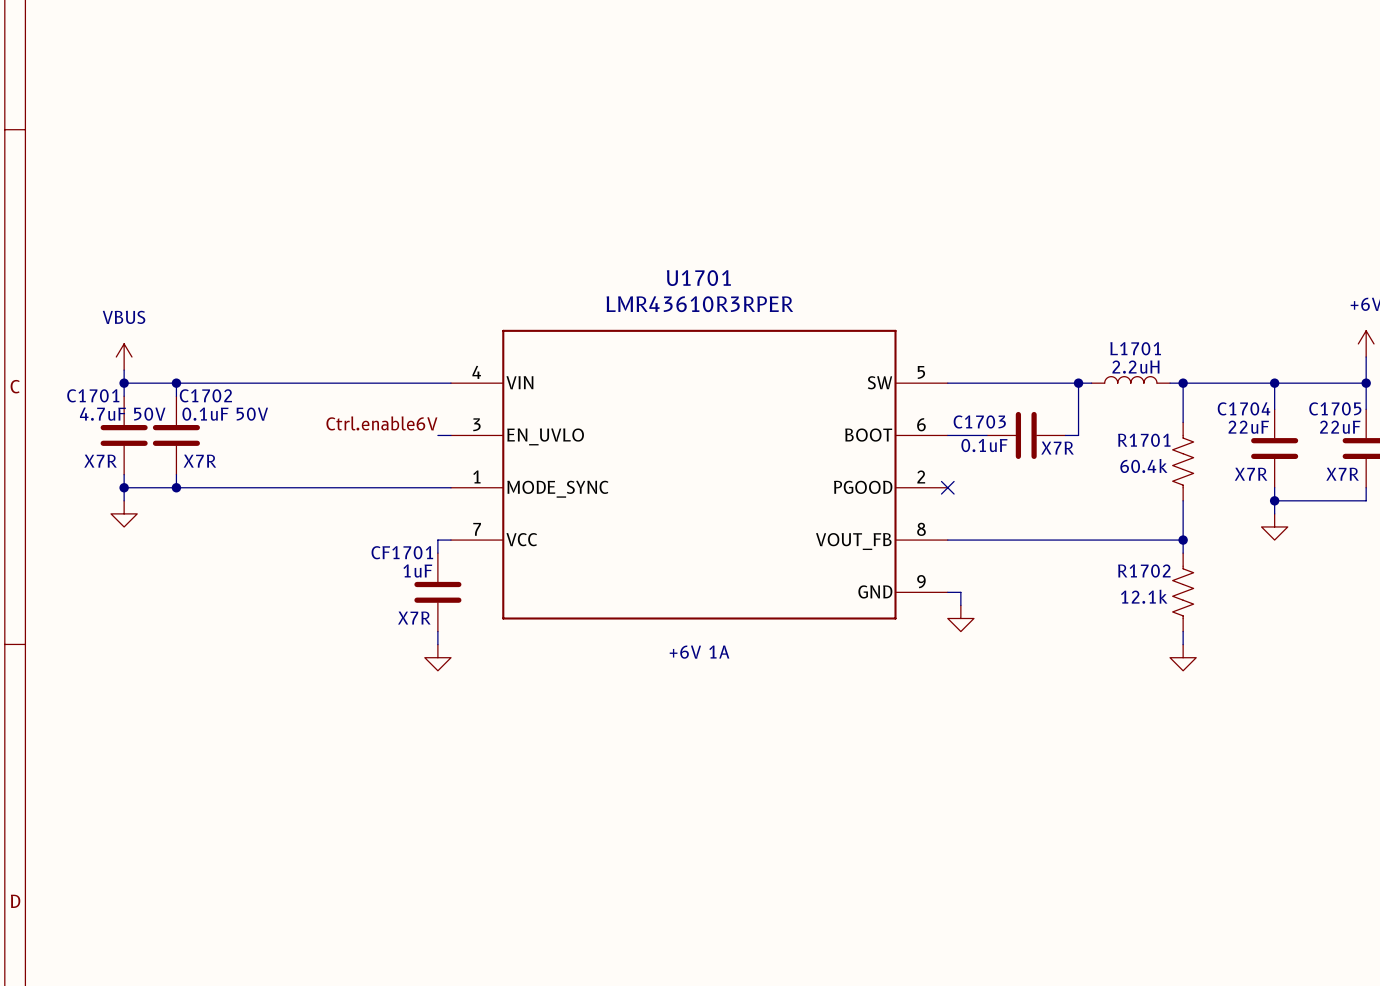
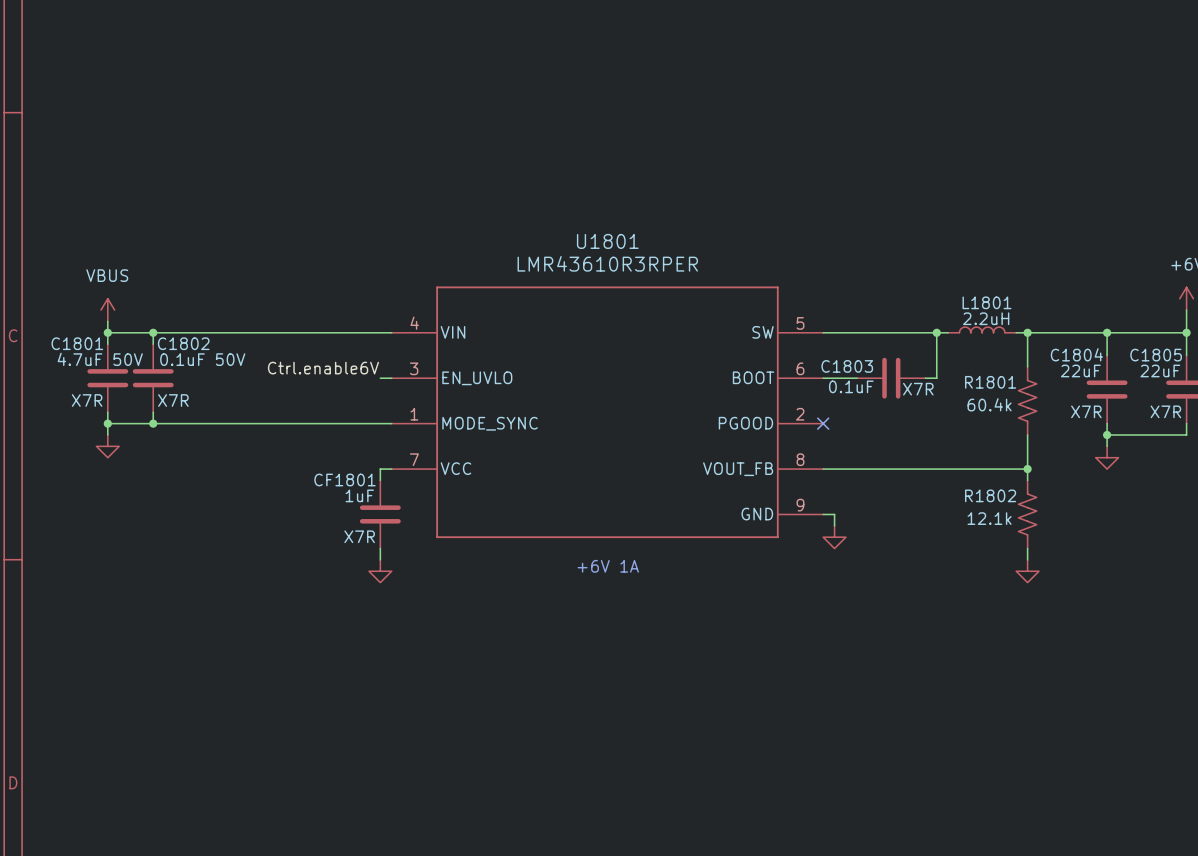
U1701 name: U1701 (698, 278) -> U1801 (607, 241)
L1701 name: L1701 (1135, 348) -> L1801 (986, 302)
C1701 name: C1701 (93, 395) -> C1801 (77, 343)
C1702 name: C1702 (205, 395) -> C1802 (183, 343)
C1704 name: C1704 (1244, 408) -> C1804 (1076, 354)
C1705 name: C1705 (1335, 408) -> C1805 (1156, 355)
C1703 name: C1703 (979, 421) -> C1803 (847, 366)
R1701 name: R1701 (1144, 440) -> R1801 (990, 382)
CF1701 name: CF1701 (402, 552) -> CF1801 (345, 479)
R1702 name: R1702 (1144, 571) -> R1802 (990, 495)

